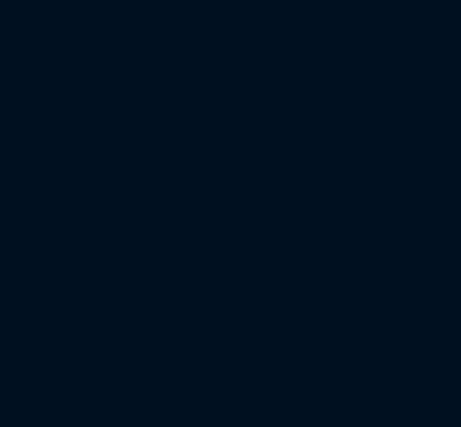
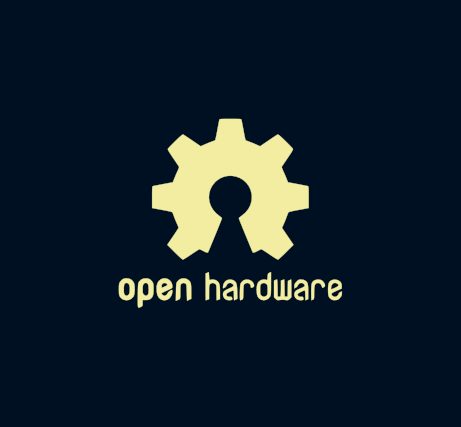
drawing: none -> [118, 118, 343, 308]

